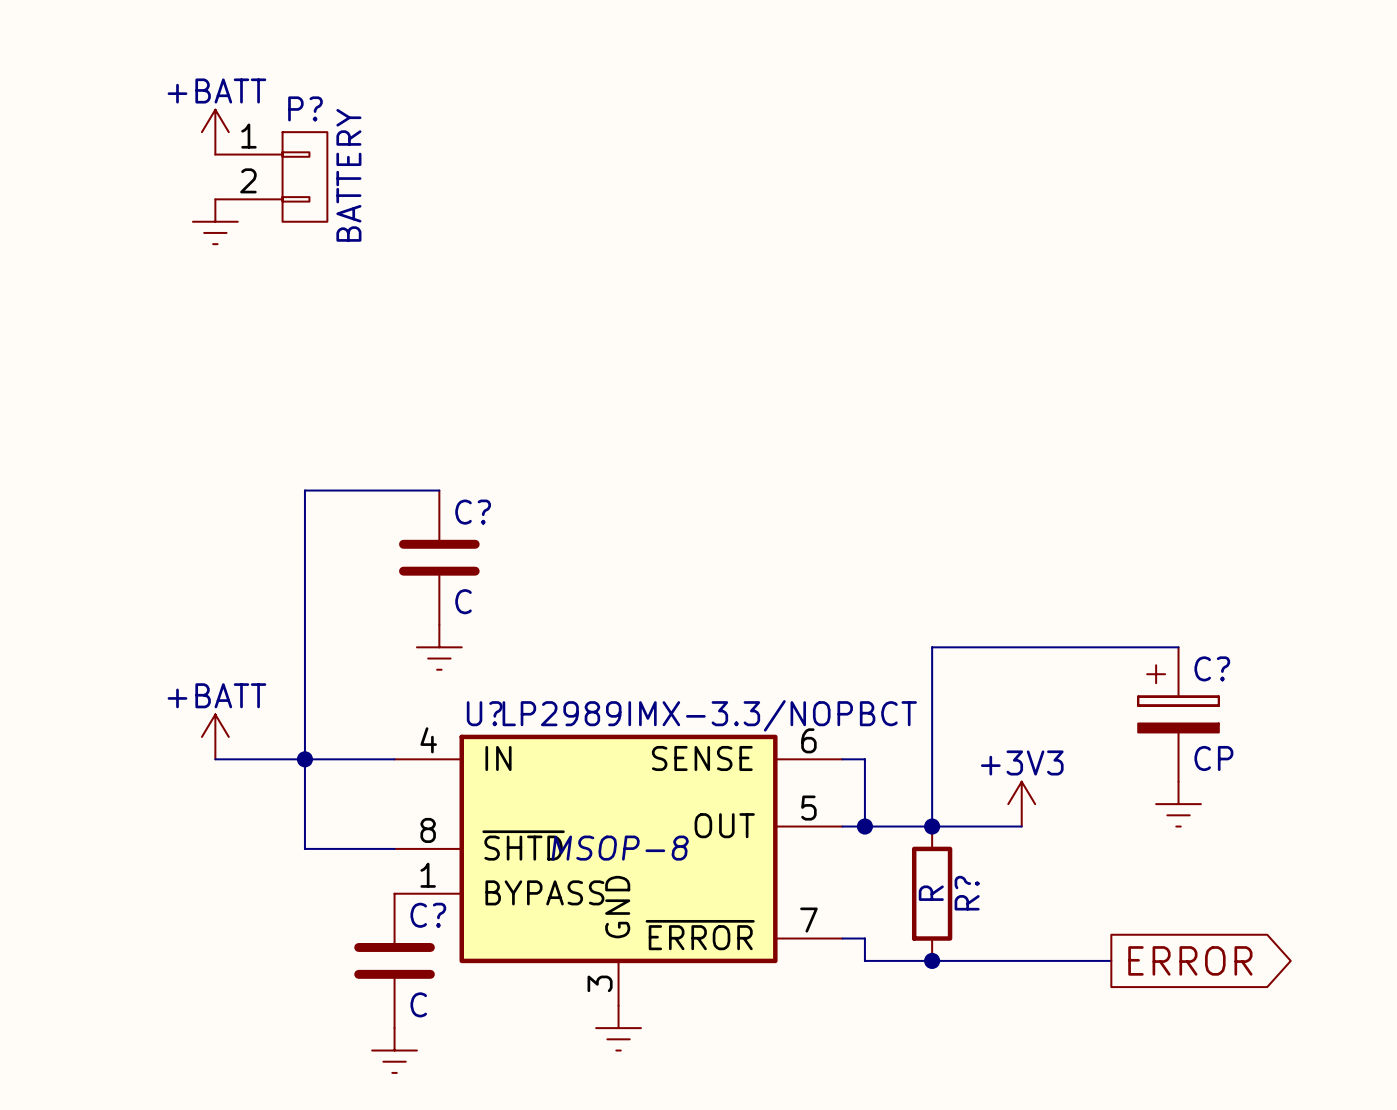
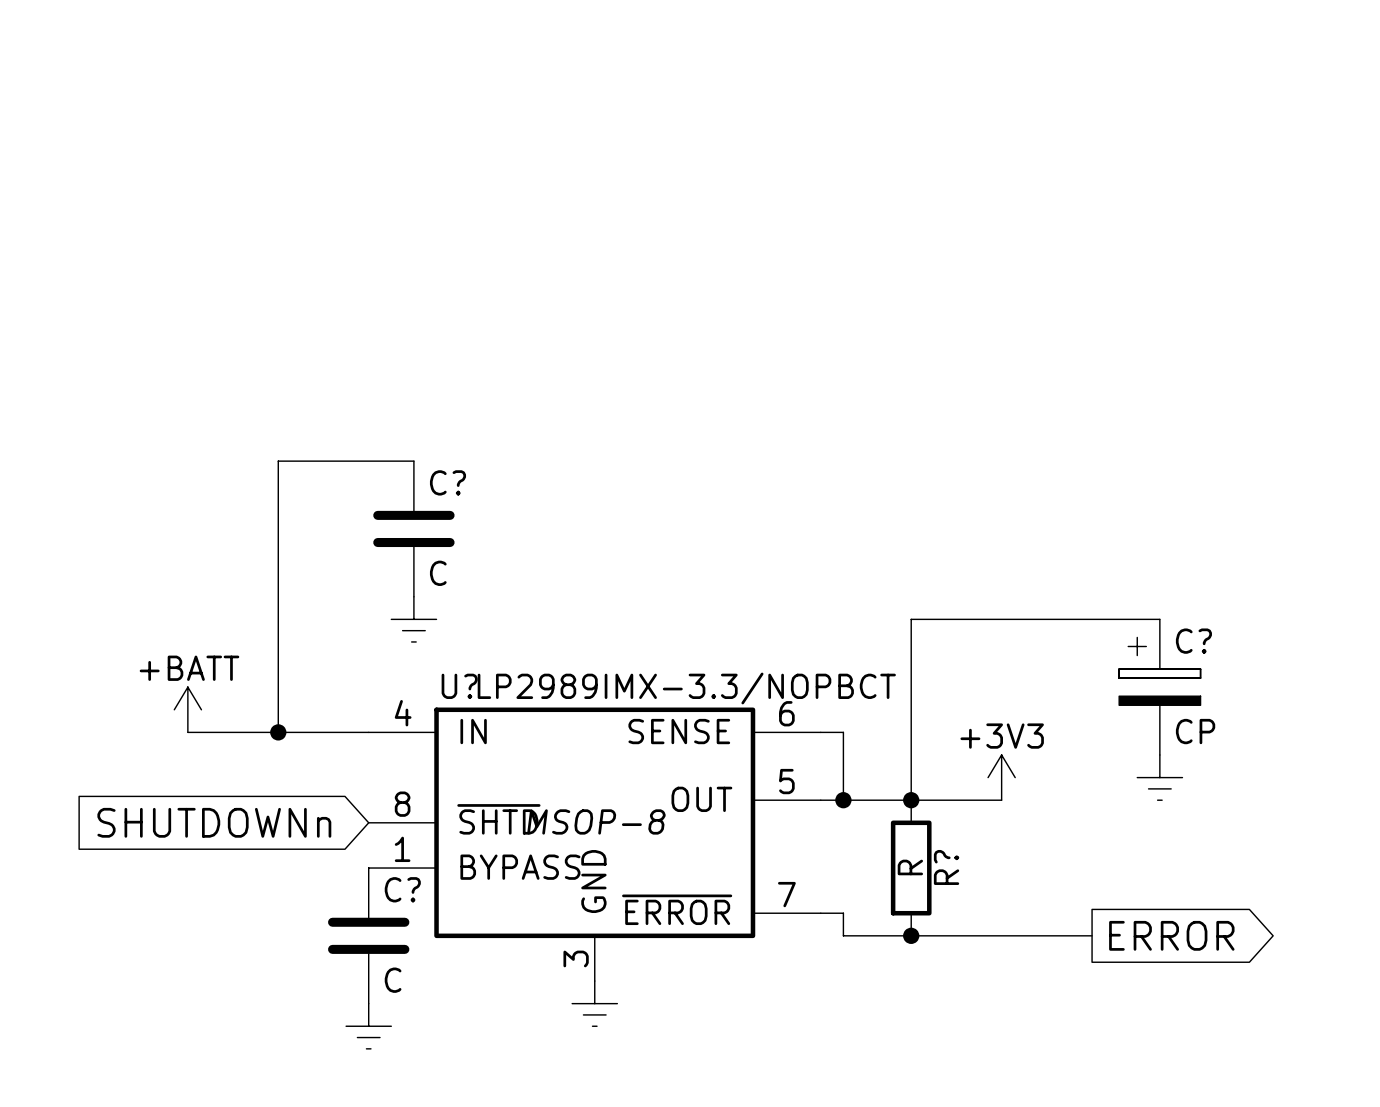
power symbol: +BATT (215, 132) -> none
P?: BATTERY (271, 176) -> none
power symbol: (215, 221) -> none
wire: (304, 759) (304, 848) (394, 848) -> none
global label: none -> SHUTDOWNn (214, 822)

